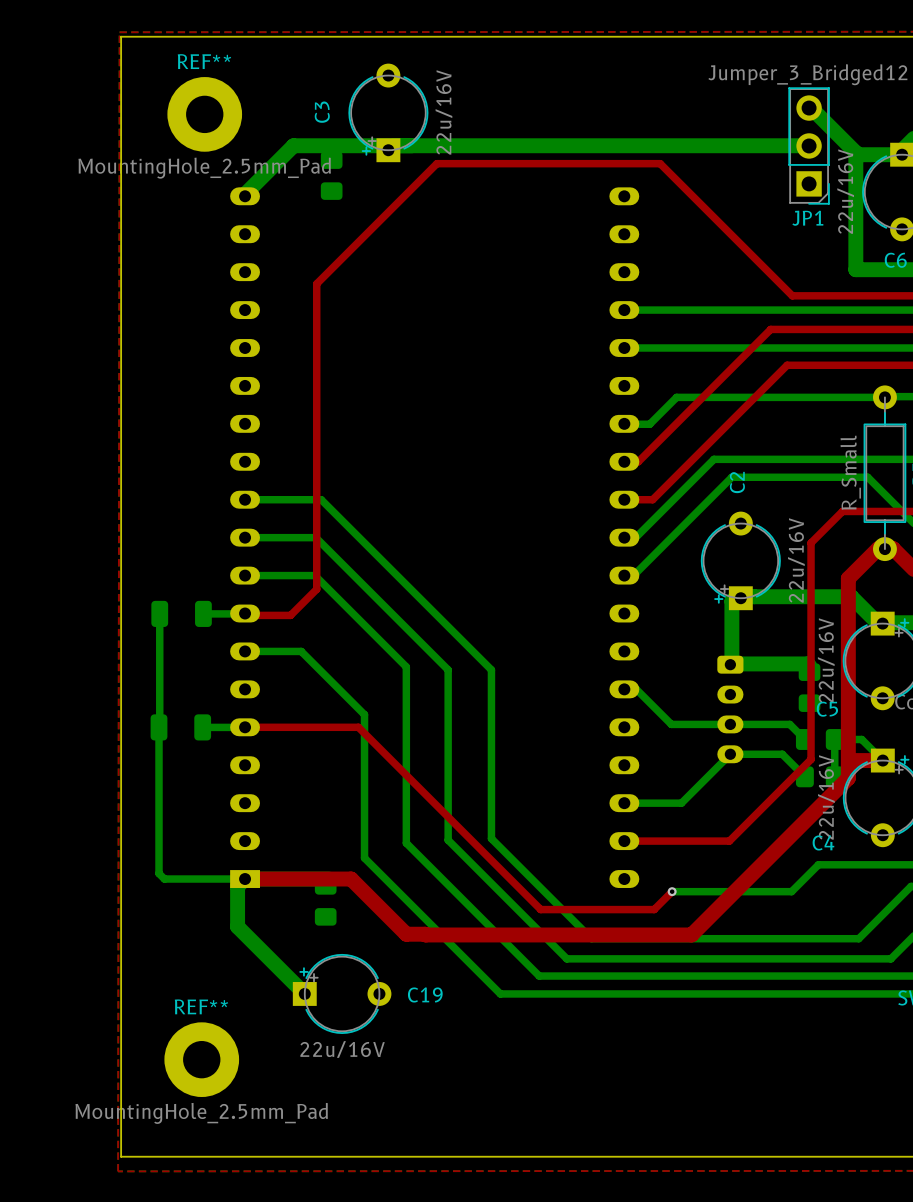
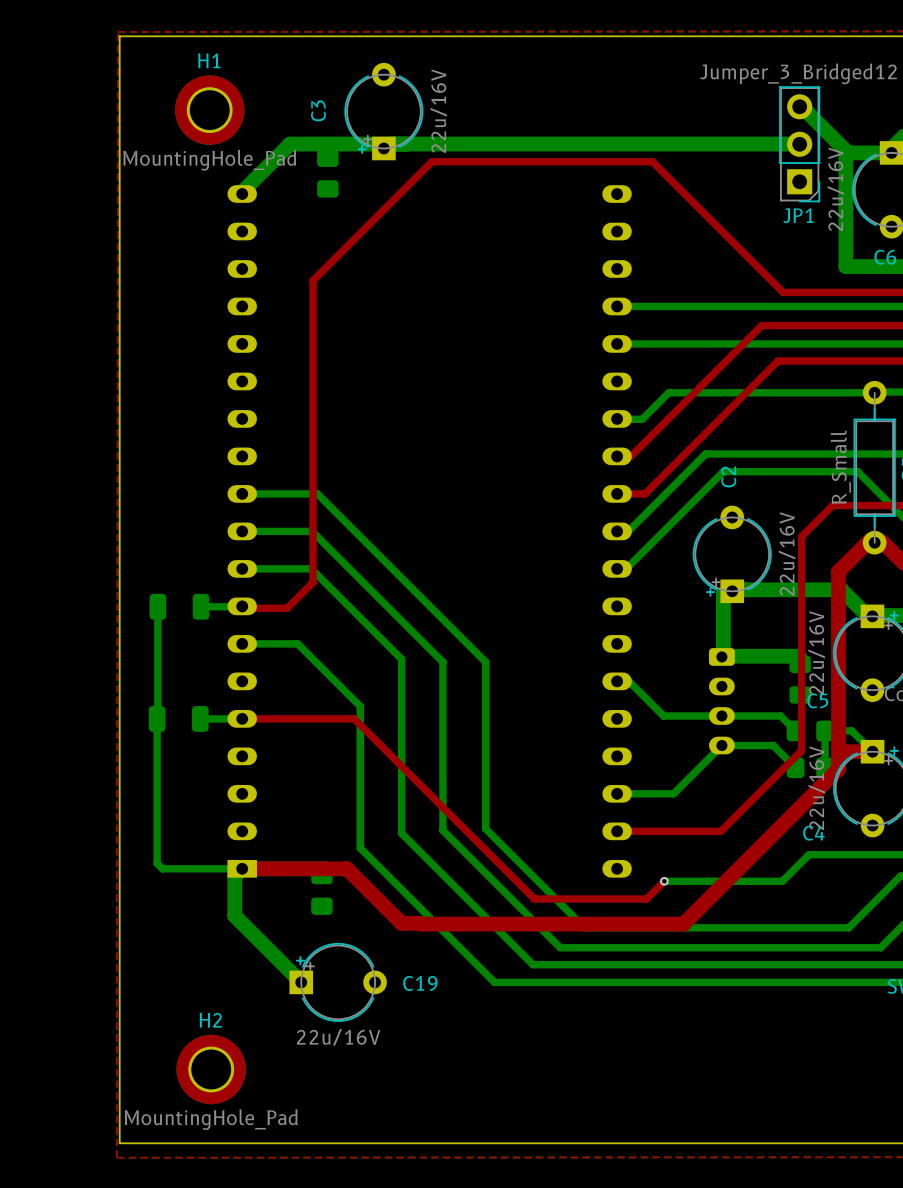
H1: none -> MountingHole_Pad (209, 110)
REF**: MountingHole_2.5mm_Pad (204, 114) -> none
REF**: MountingHole_2.5mm_Pad (201, 1059) -> none
H2: none -> MountingHole_Pad (211, 1069)

